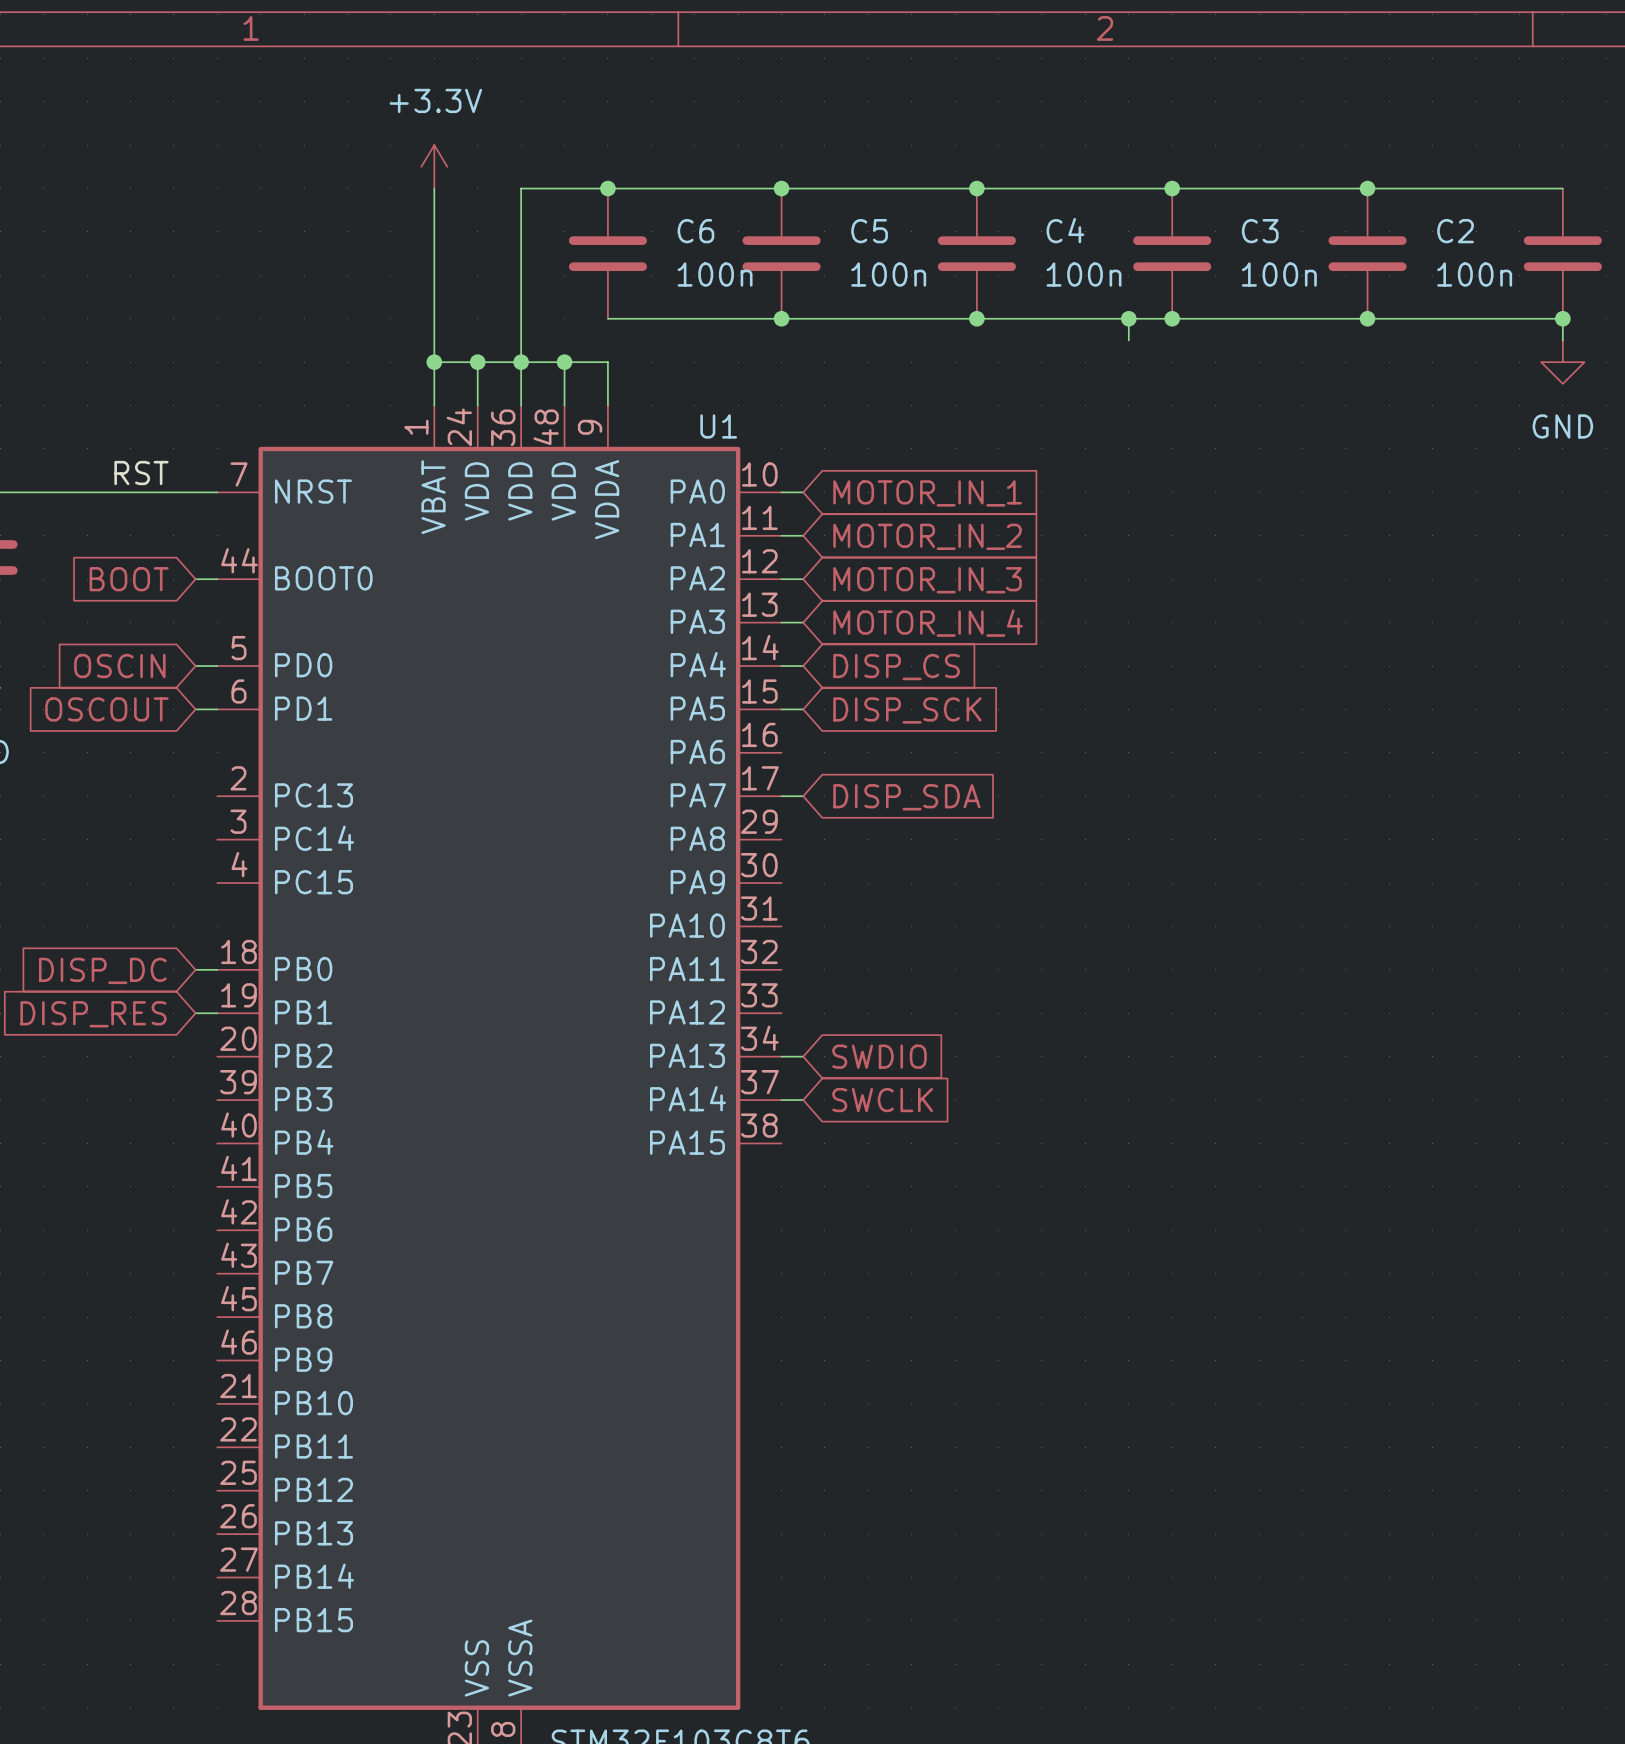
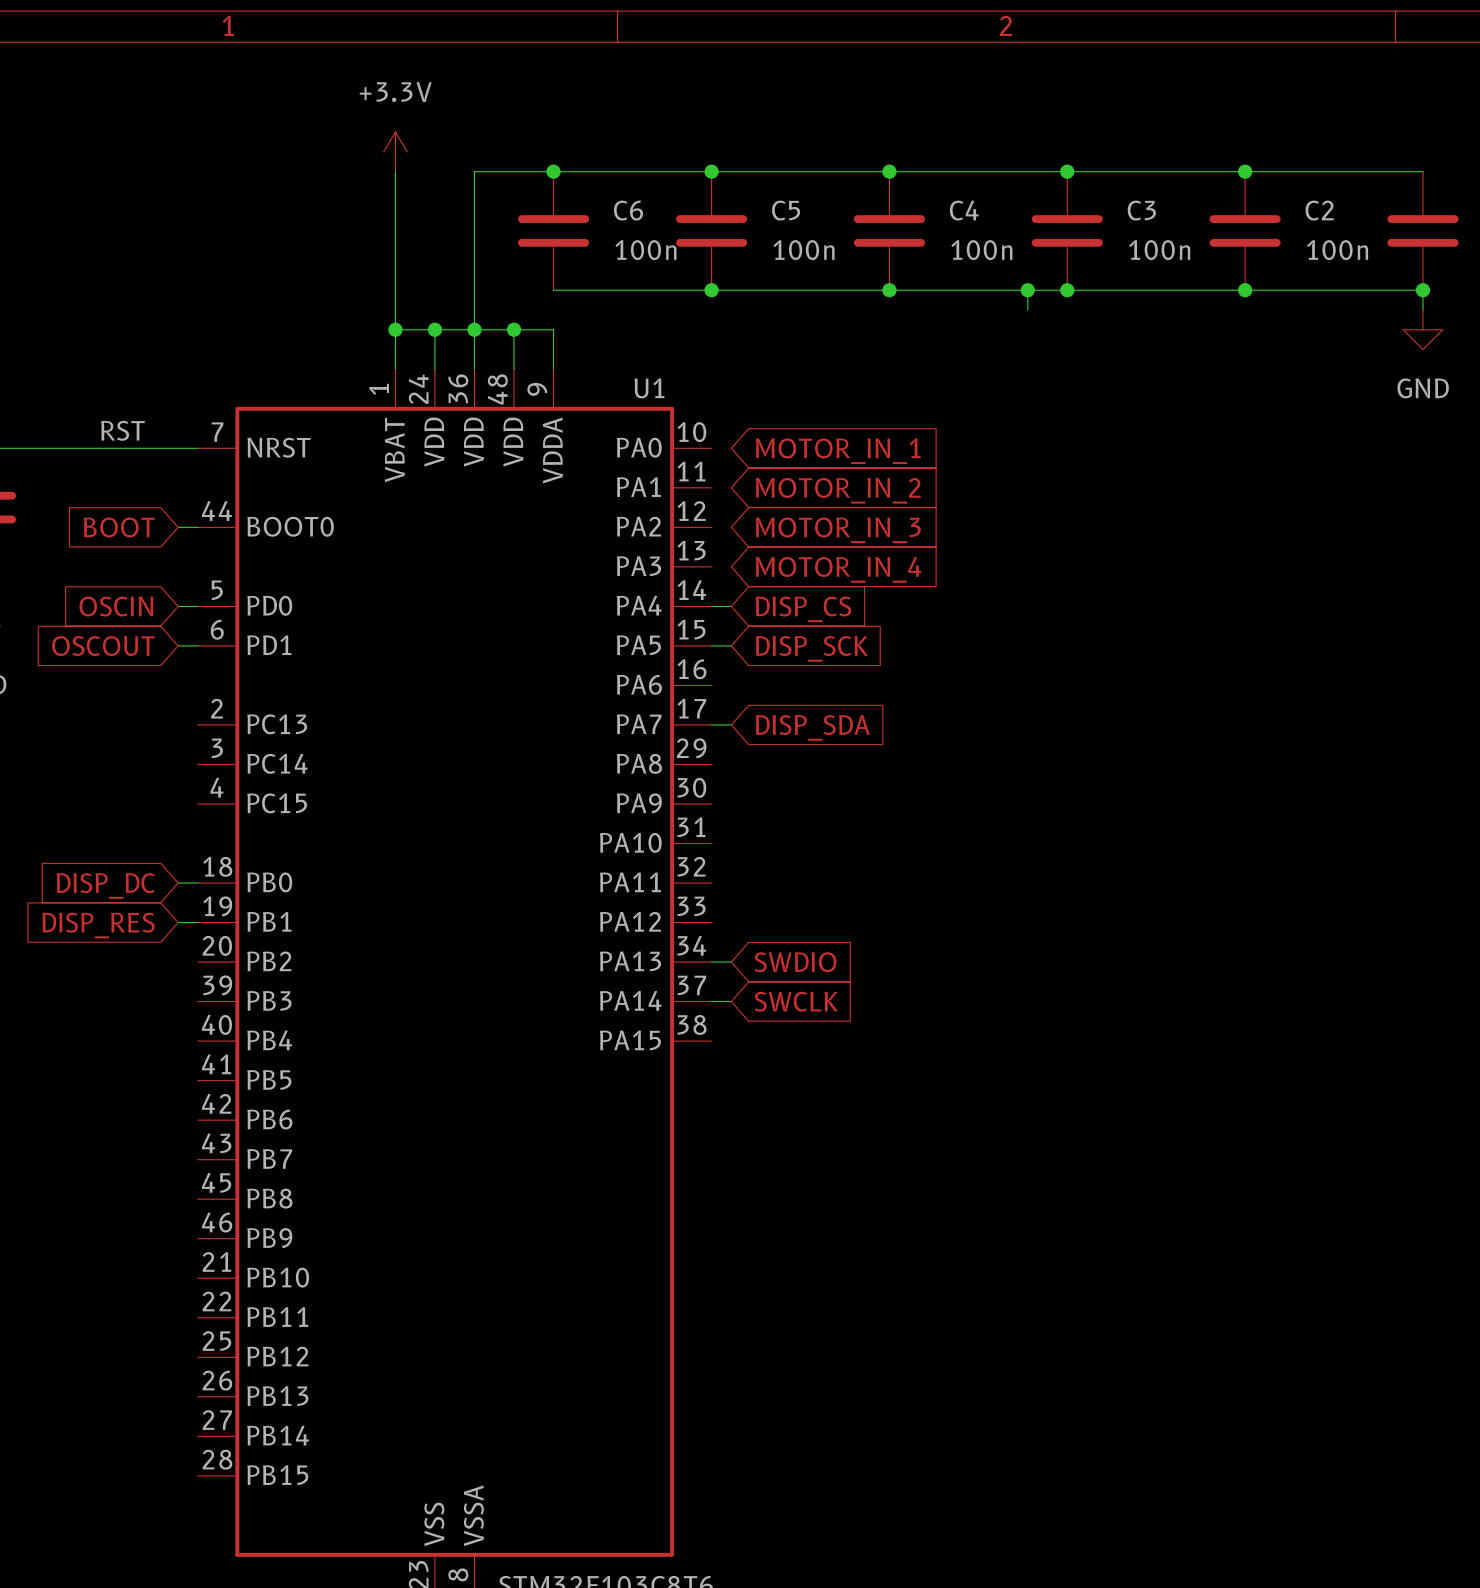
wire: (781, 492) (803, 492) -> none
wire: (781, 535) (803, 535) -> none
wire: (781, 579) (803, 579) -> none
wire: (781, 622) (803, 622) -> none

